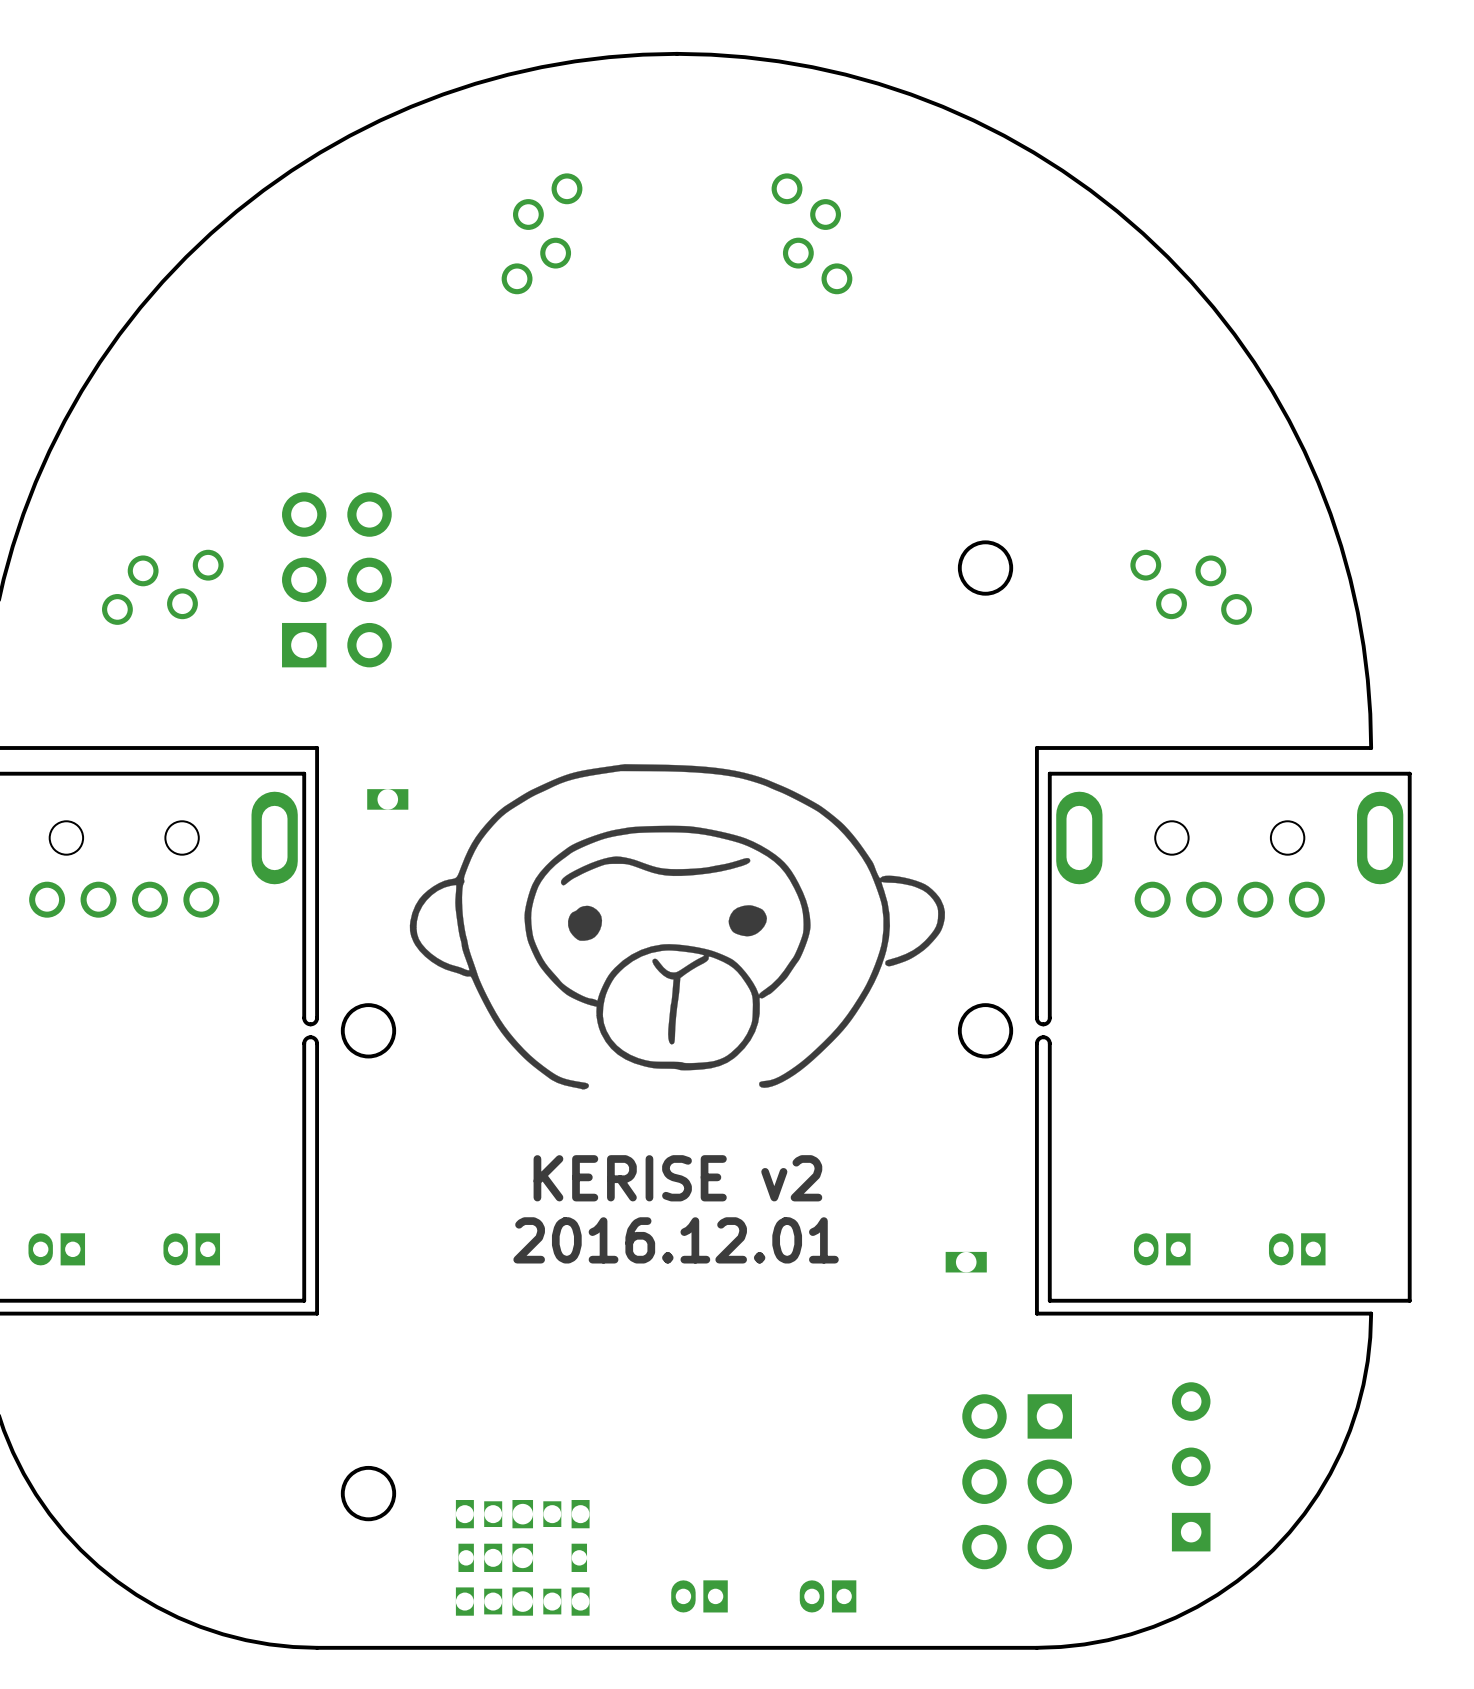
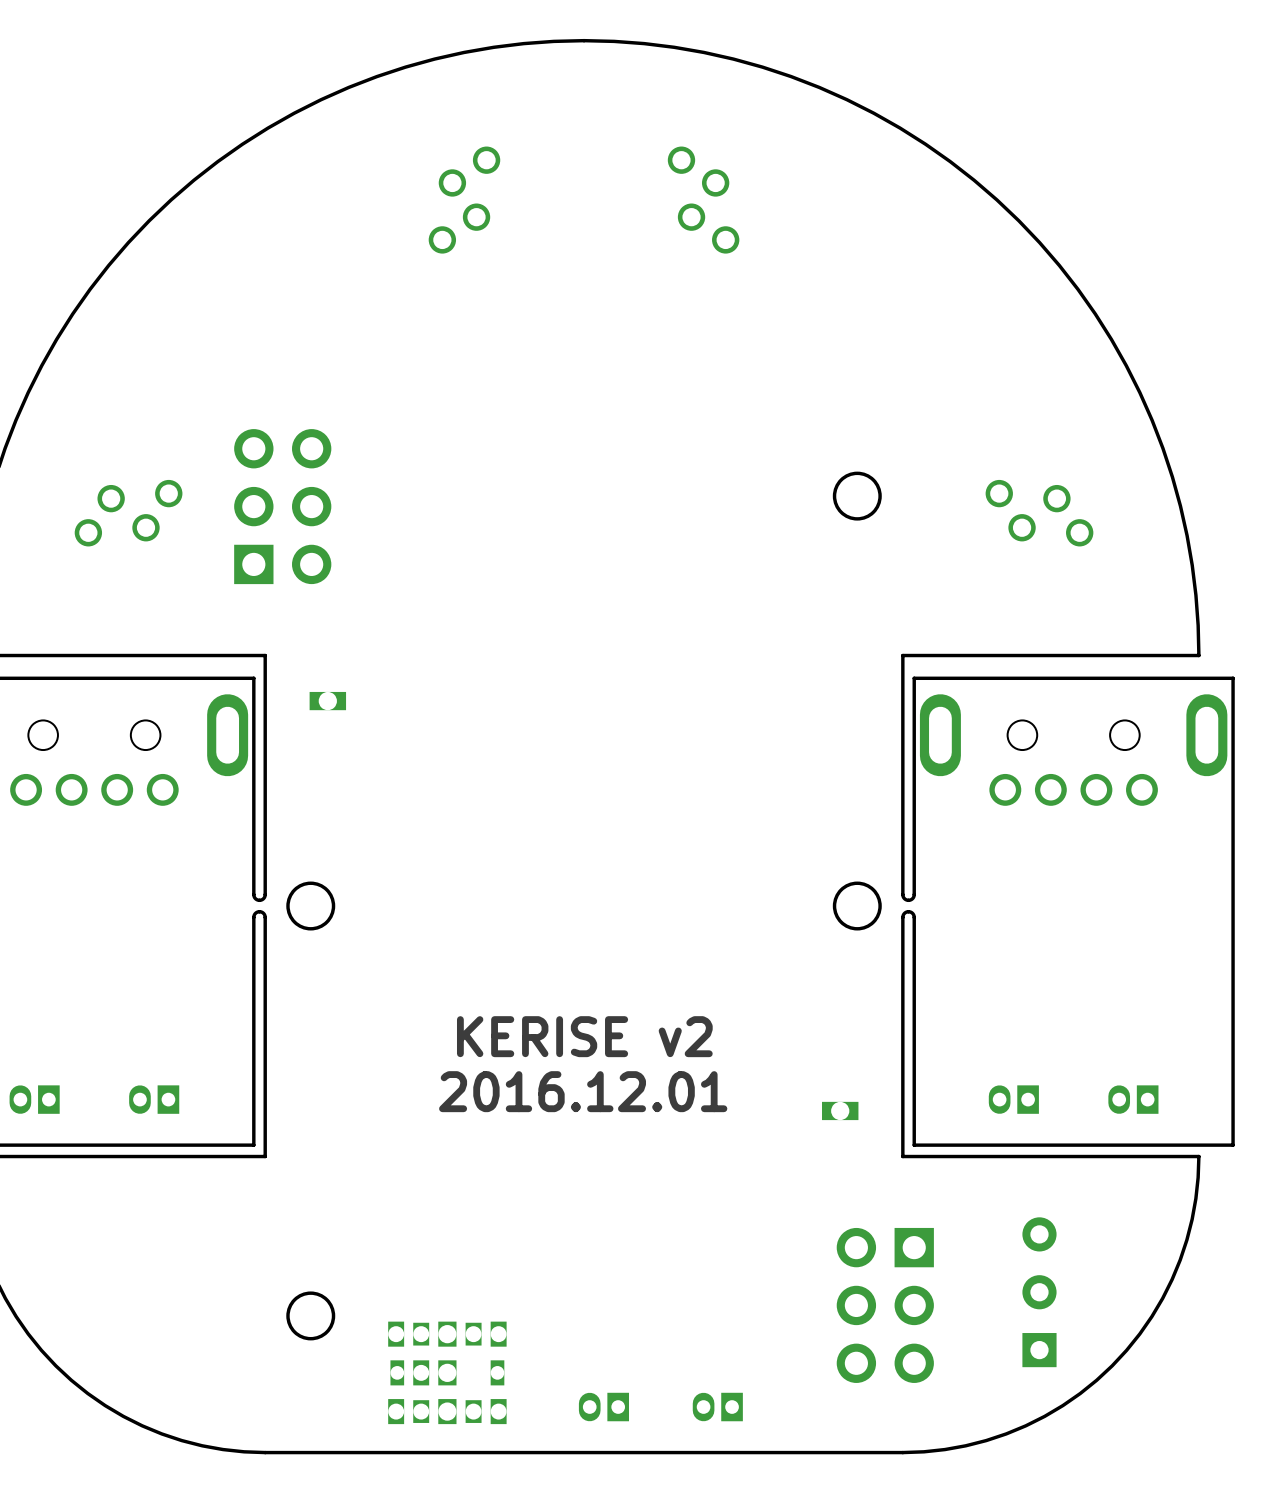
drawing: [409, 764, 946, 1090] -> none

